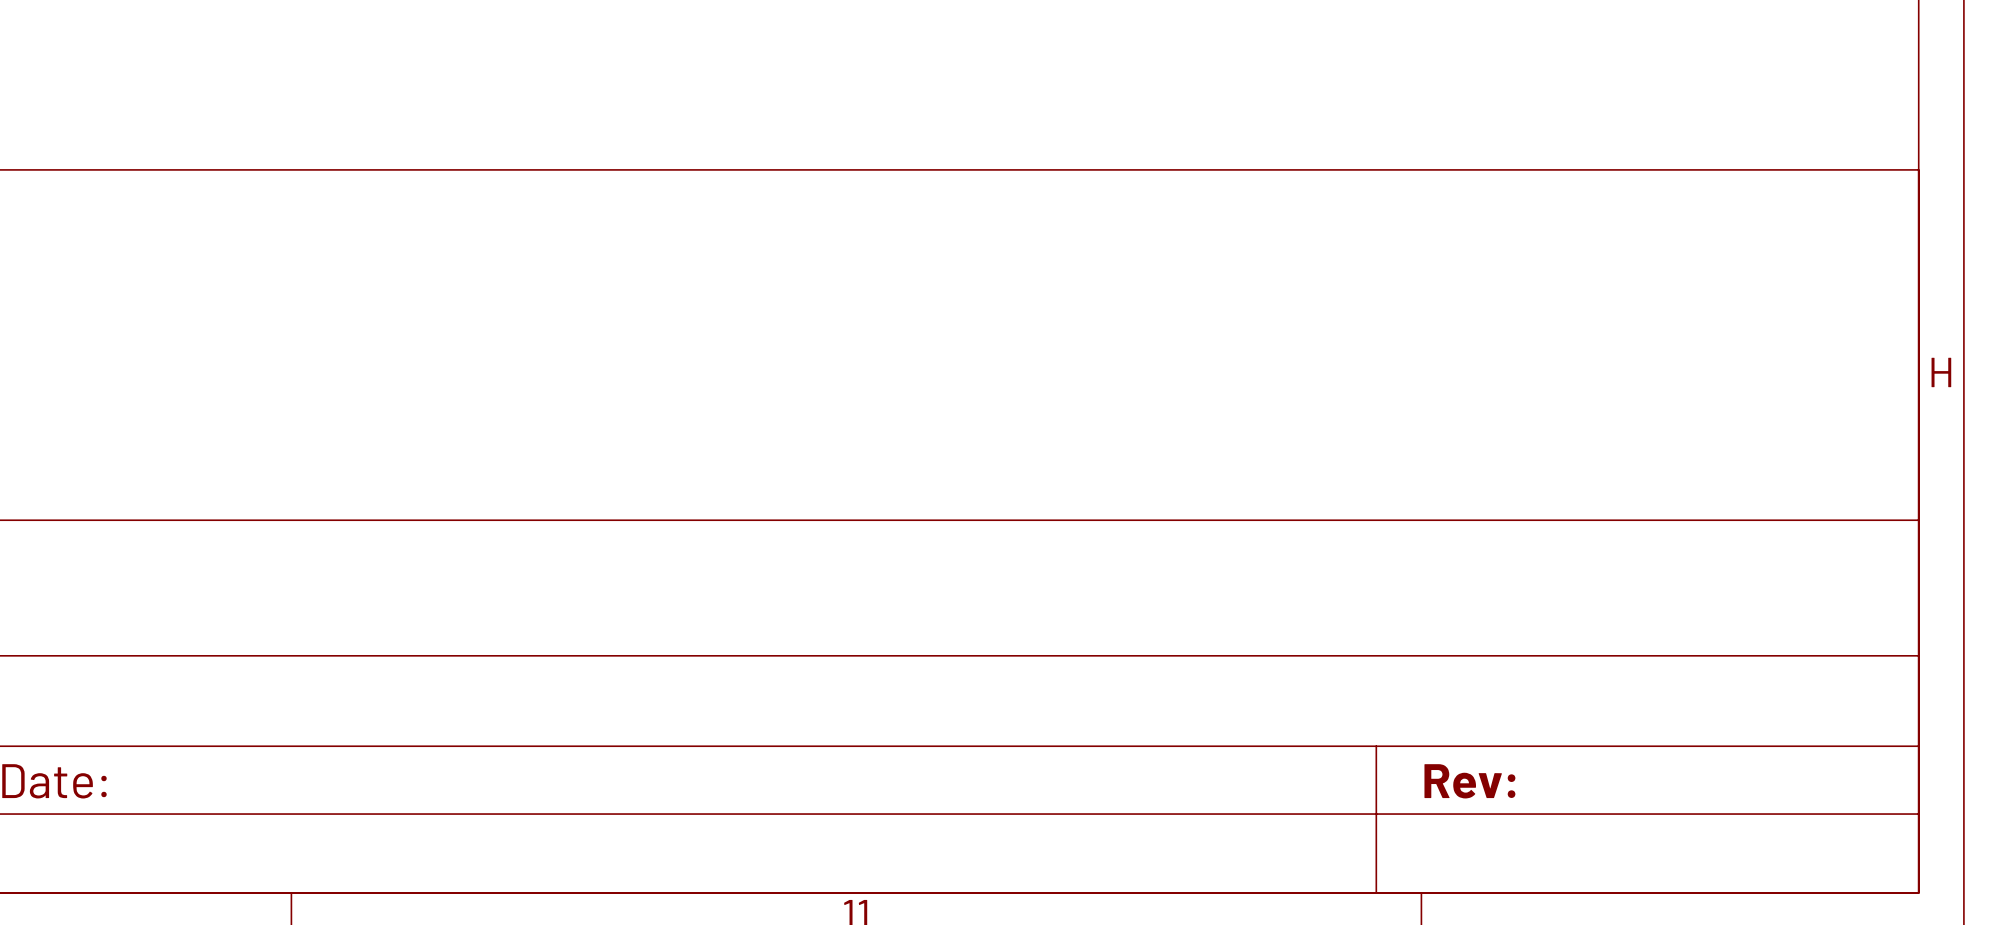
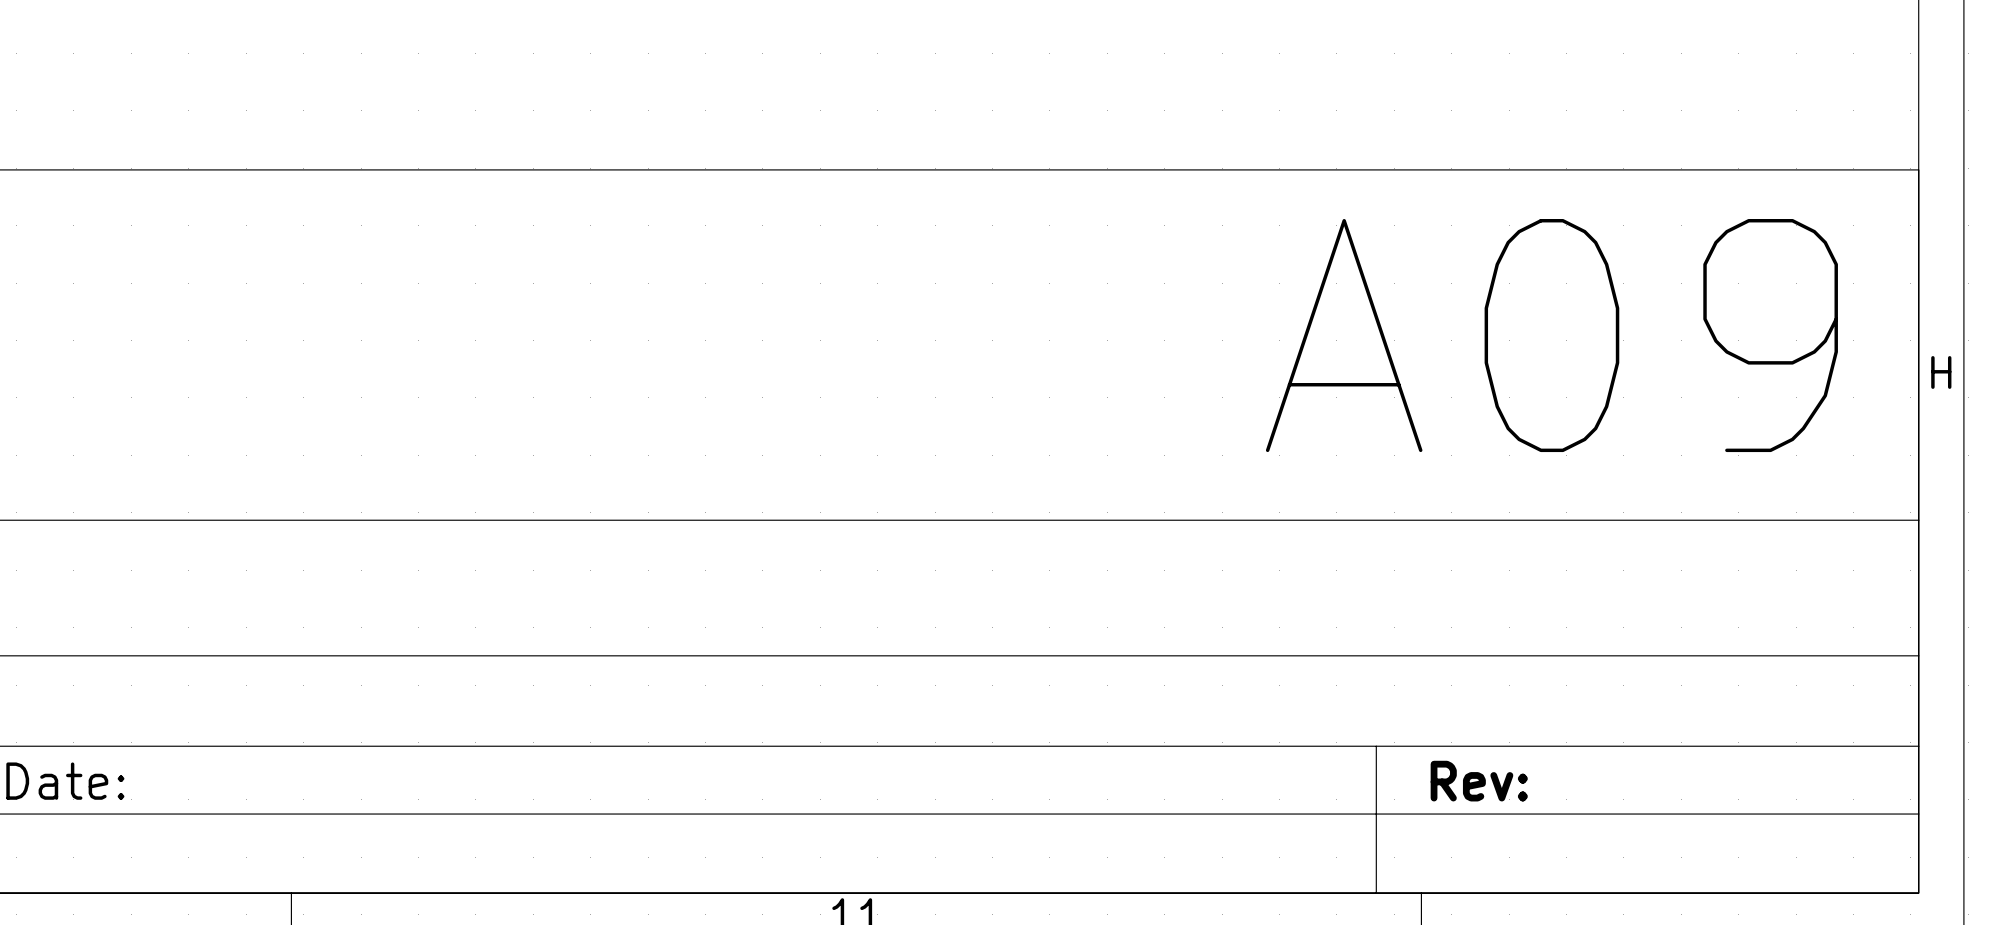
text: none -> A09 (1551, 335)

